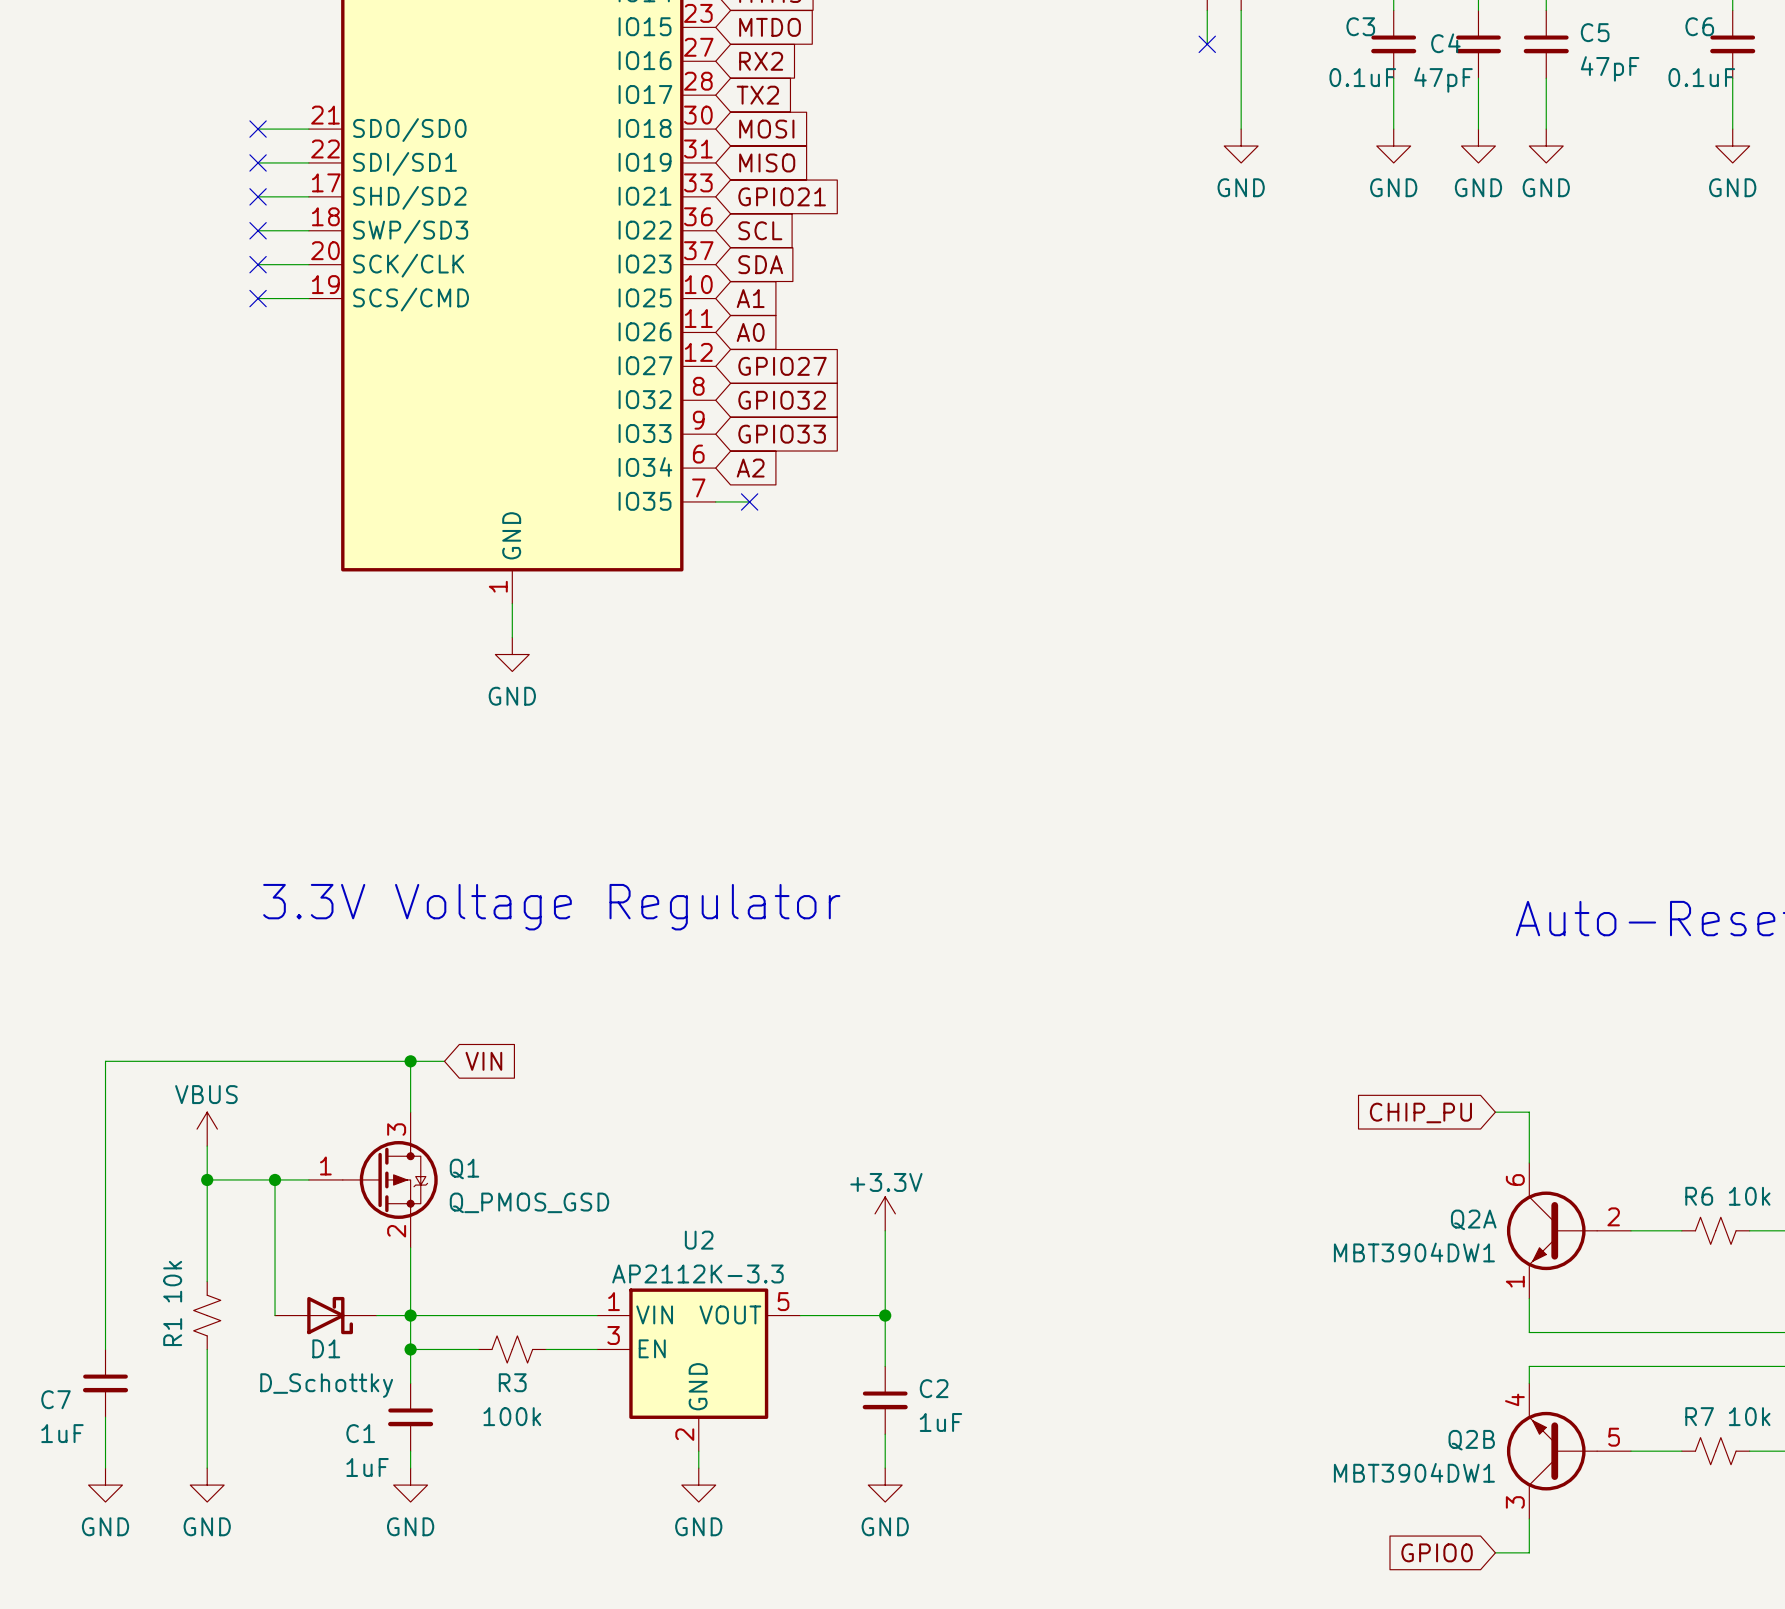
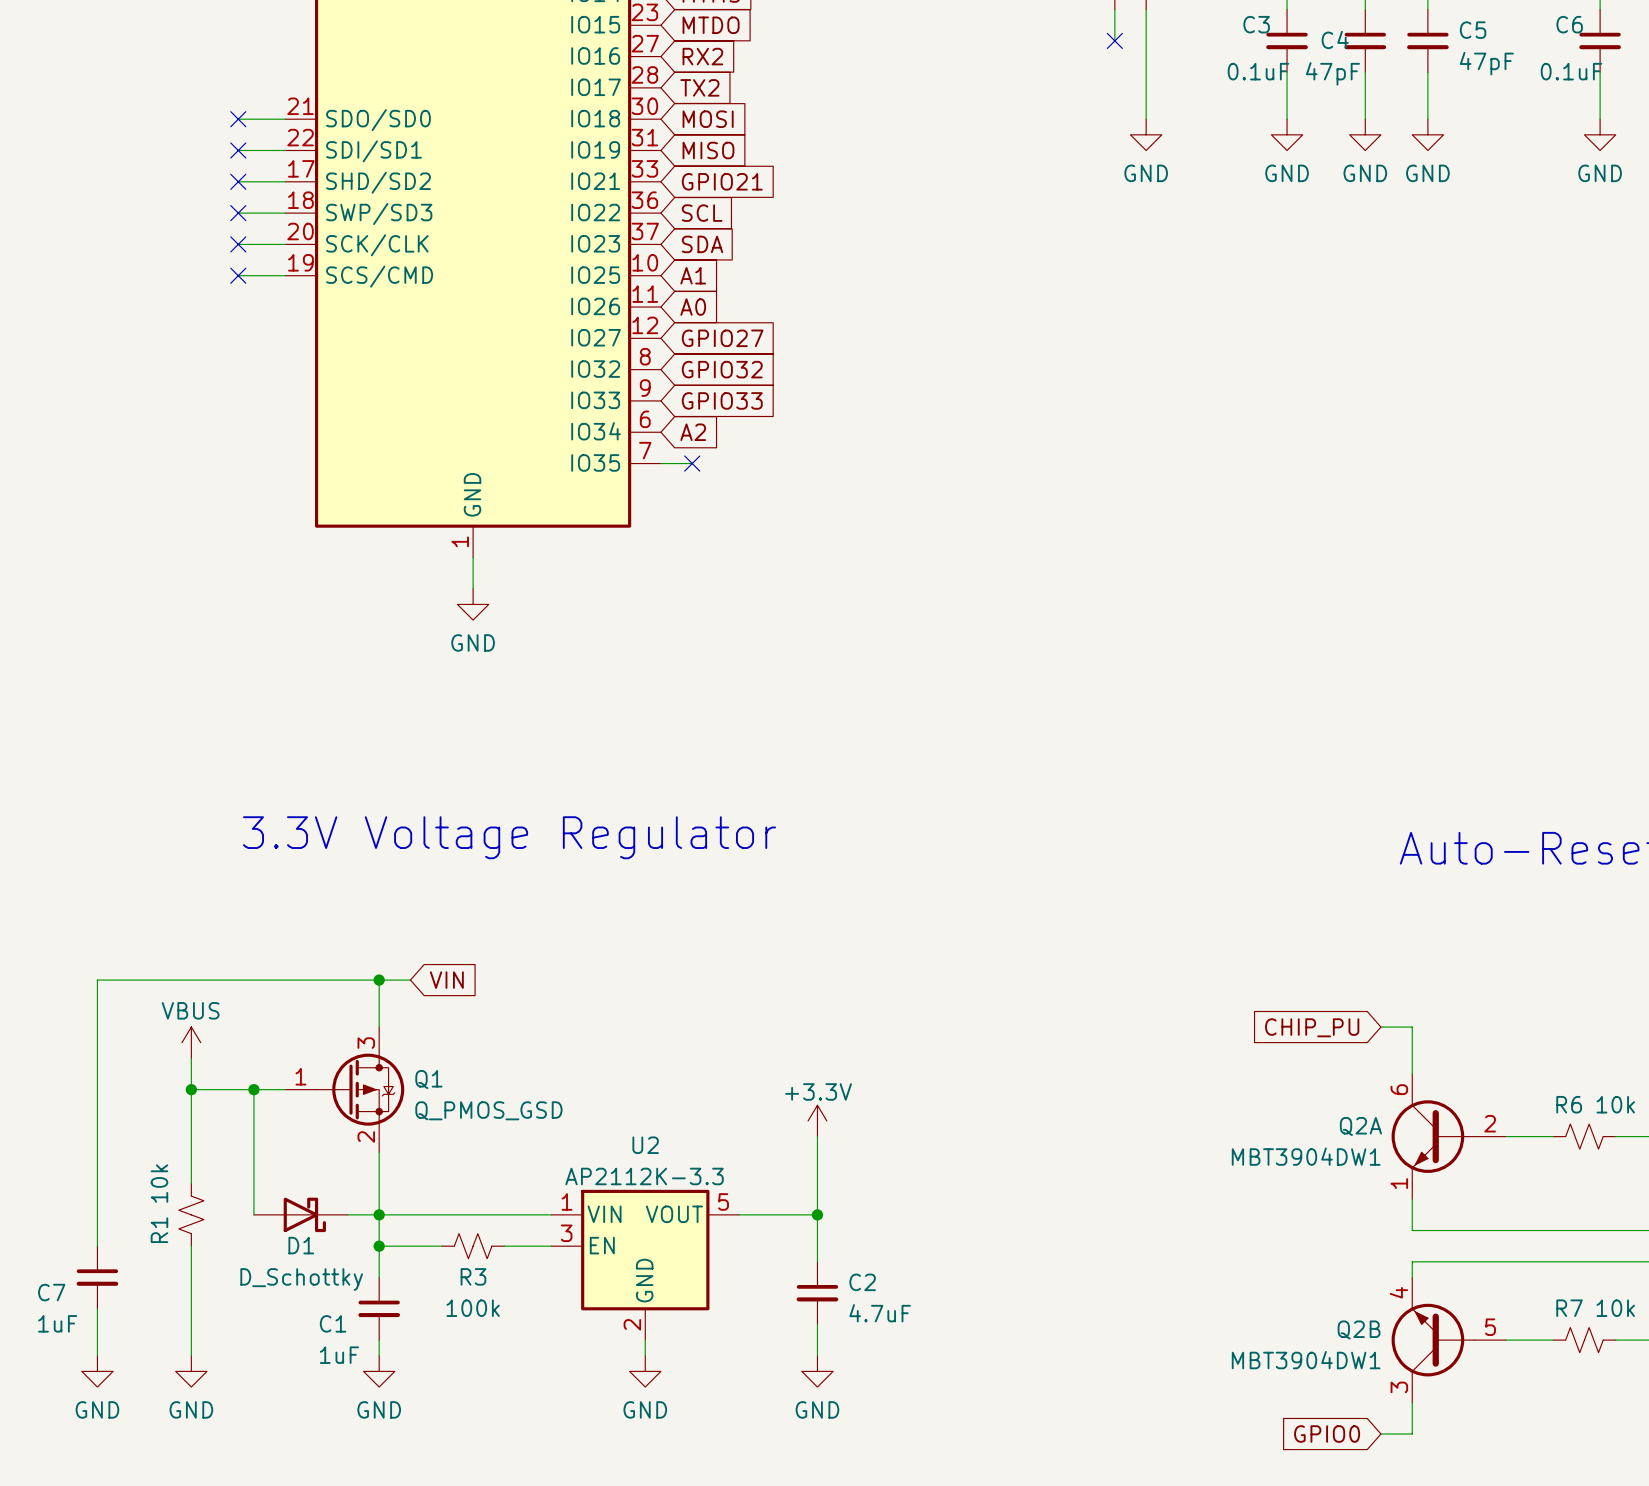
C2 value: 1uF (940, 1422) -> 4.7uF (880, 1313)

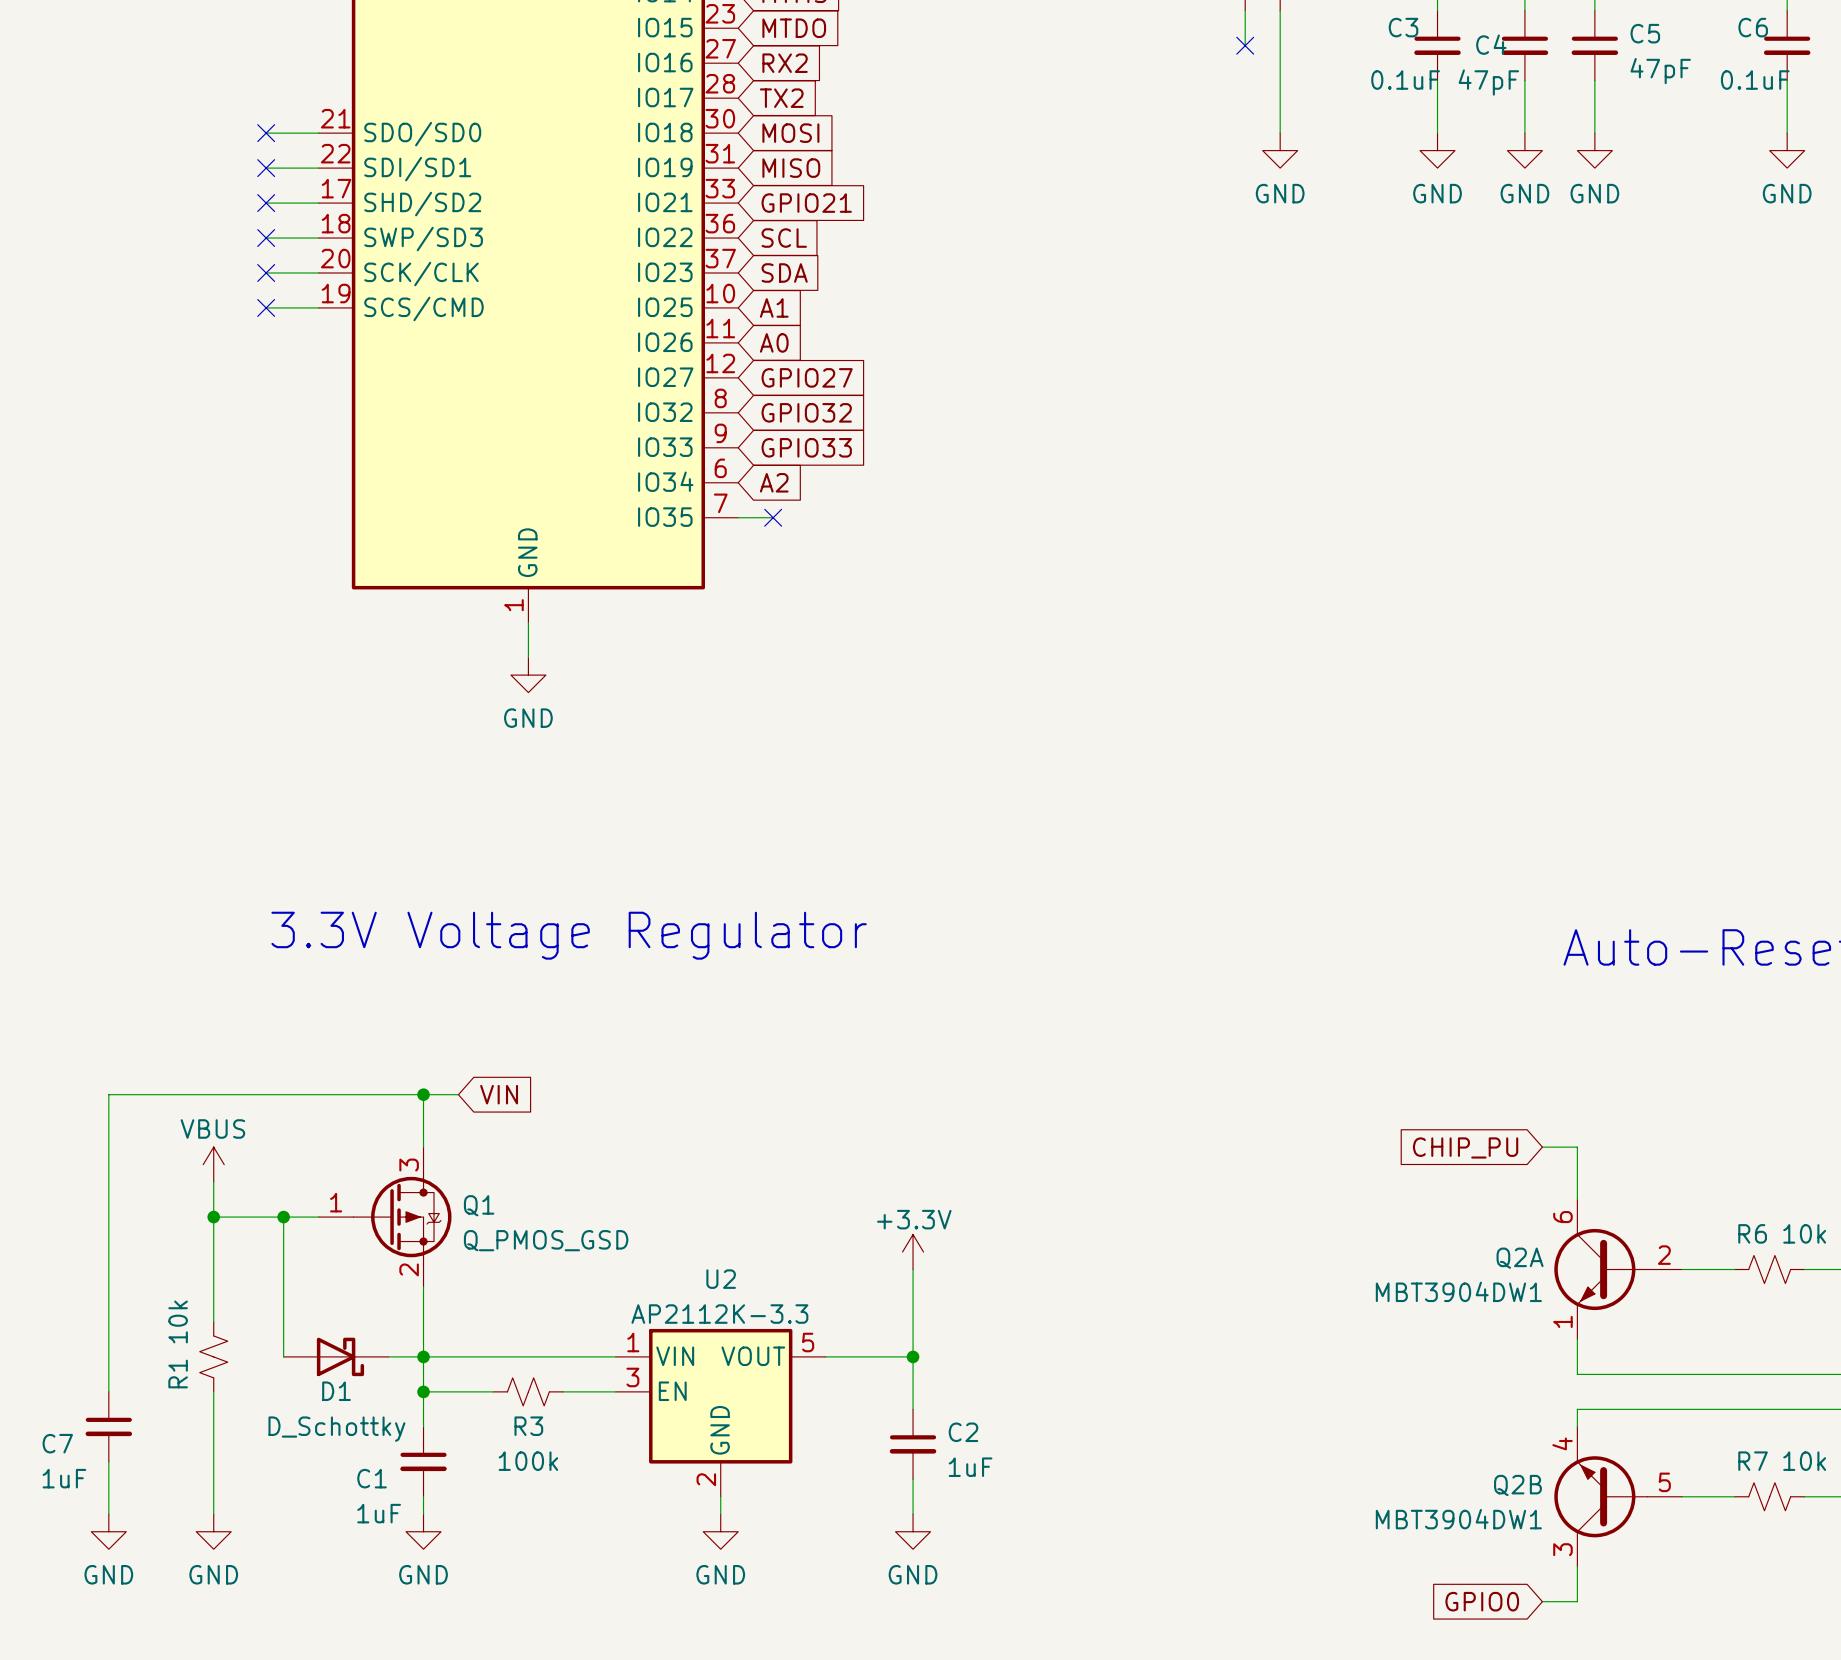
C2 value: 4.7uF (880, 1313) -> 1uF (970, 1467)

